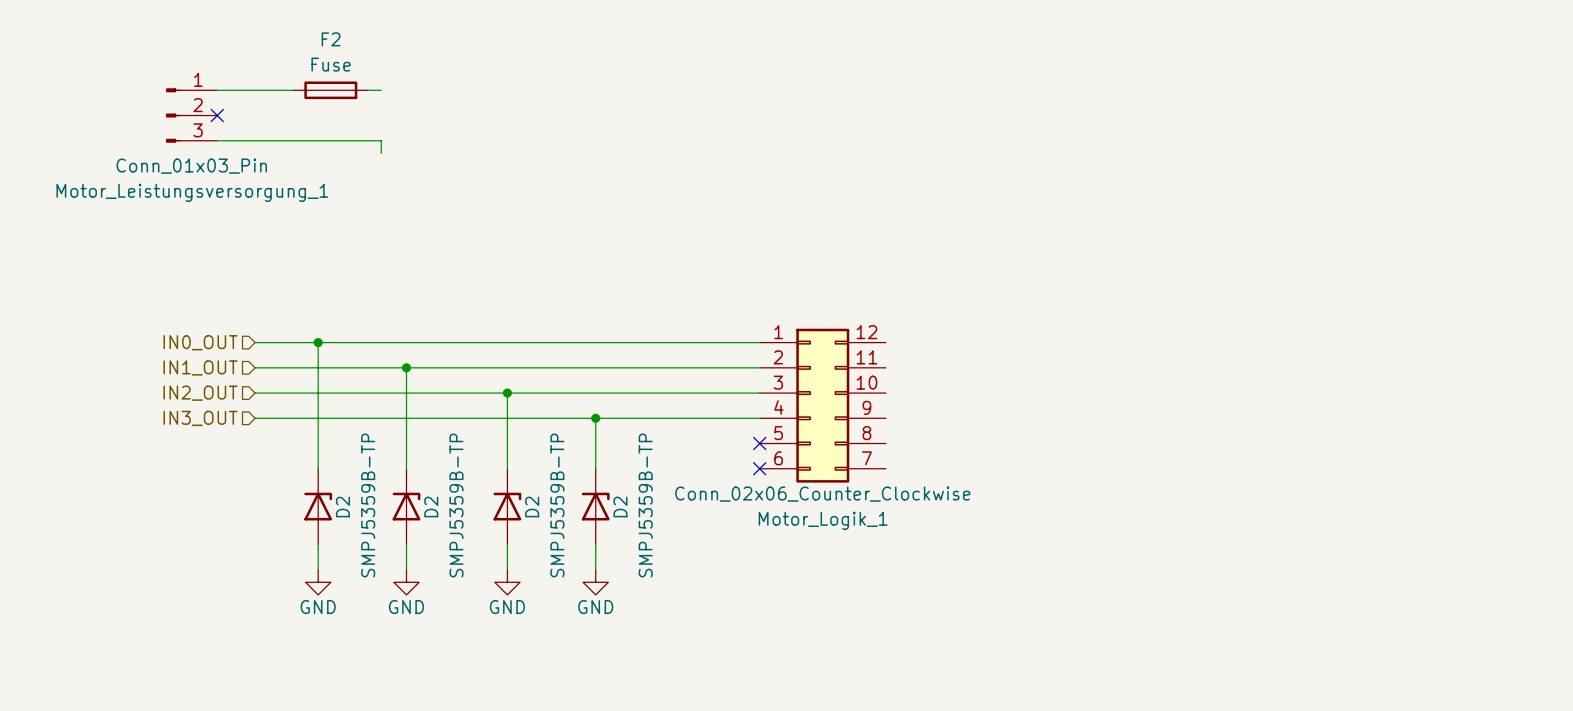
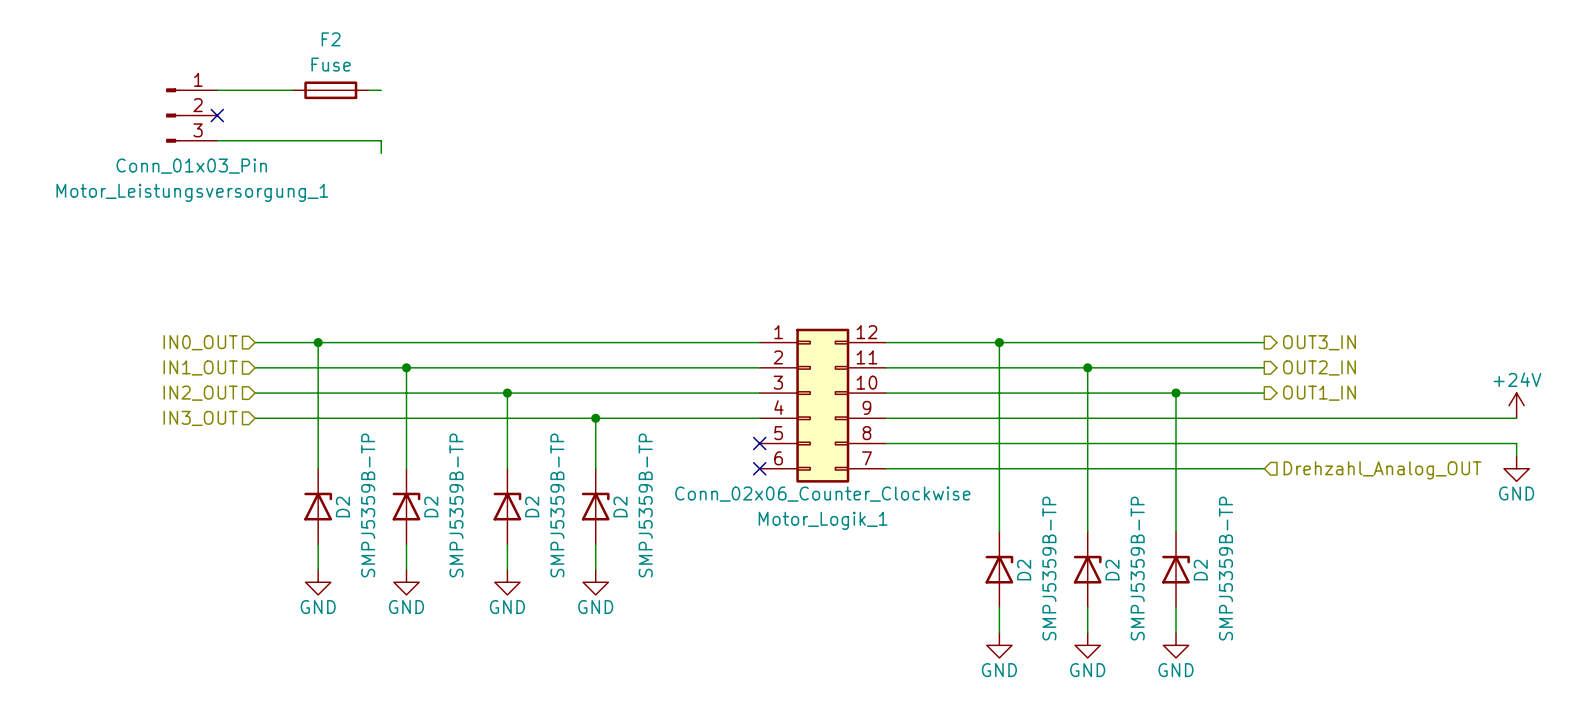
wire: none -> (885, 342) (1264, 342)
wire: none -> (999, 342) (999, 531)
junction: none -> (999, 342)
hierarchical label: none -> OUT3_IN (1319, 342)
wire: none -> (885, 367) (1264, 367)
wire: none -> (1087, 367) (1087, 531)
junction: none -> (1087, 367)
hierarchical label: none -> OUT2_IN (1319, 367)
wire: none -> (885, 393) (1264, 393)
wire: none -> (1176, 393) (1176, 531)
junction: none -> (1176, 393)
hierarchical label: none -> OUT1_IN (1319, 393)
power symbol: none -> +24V (1516, 405)
wire: none -> (885, 418) (1516, 418)
wire: none -> (885, 443) (1516, 443) (1516, 456)
wire: none -> (885, 468) (1264, 468)
power symbol: none -> GND (1516, 468)
hierarchical label: none -> Drehzahl_Analog_OUT (1382, 470)
D2: none -> SMPJ5359B-TP (999, 569)
D2: none -> SMPJ5359B-TP (1087, 569)
D2: none -> SMPJ5359B-TP (1176, 569)
wire: none -> (999, 607) (999, 632)
wire: none -> (1087, 607) (1087, 632)
wire: none -> (1176, 607) (1176, 632)
power symbol: none -> GND (999, 645)
power symbol: none -> GND (1087, 645)
power symbol: none -> GND (1176, 645)

